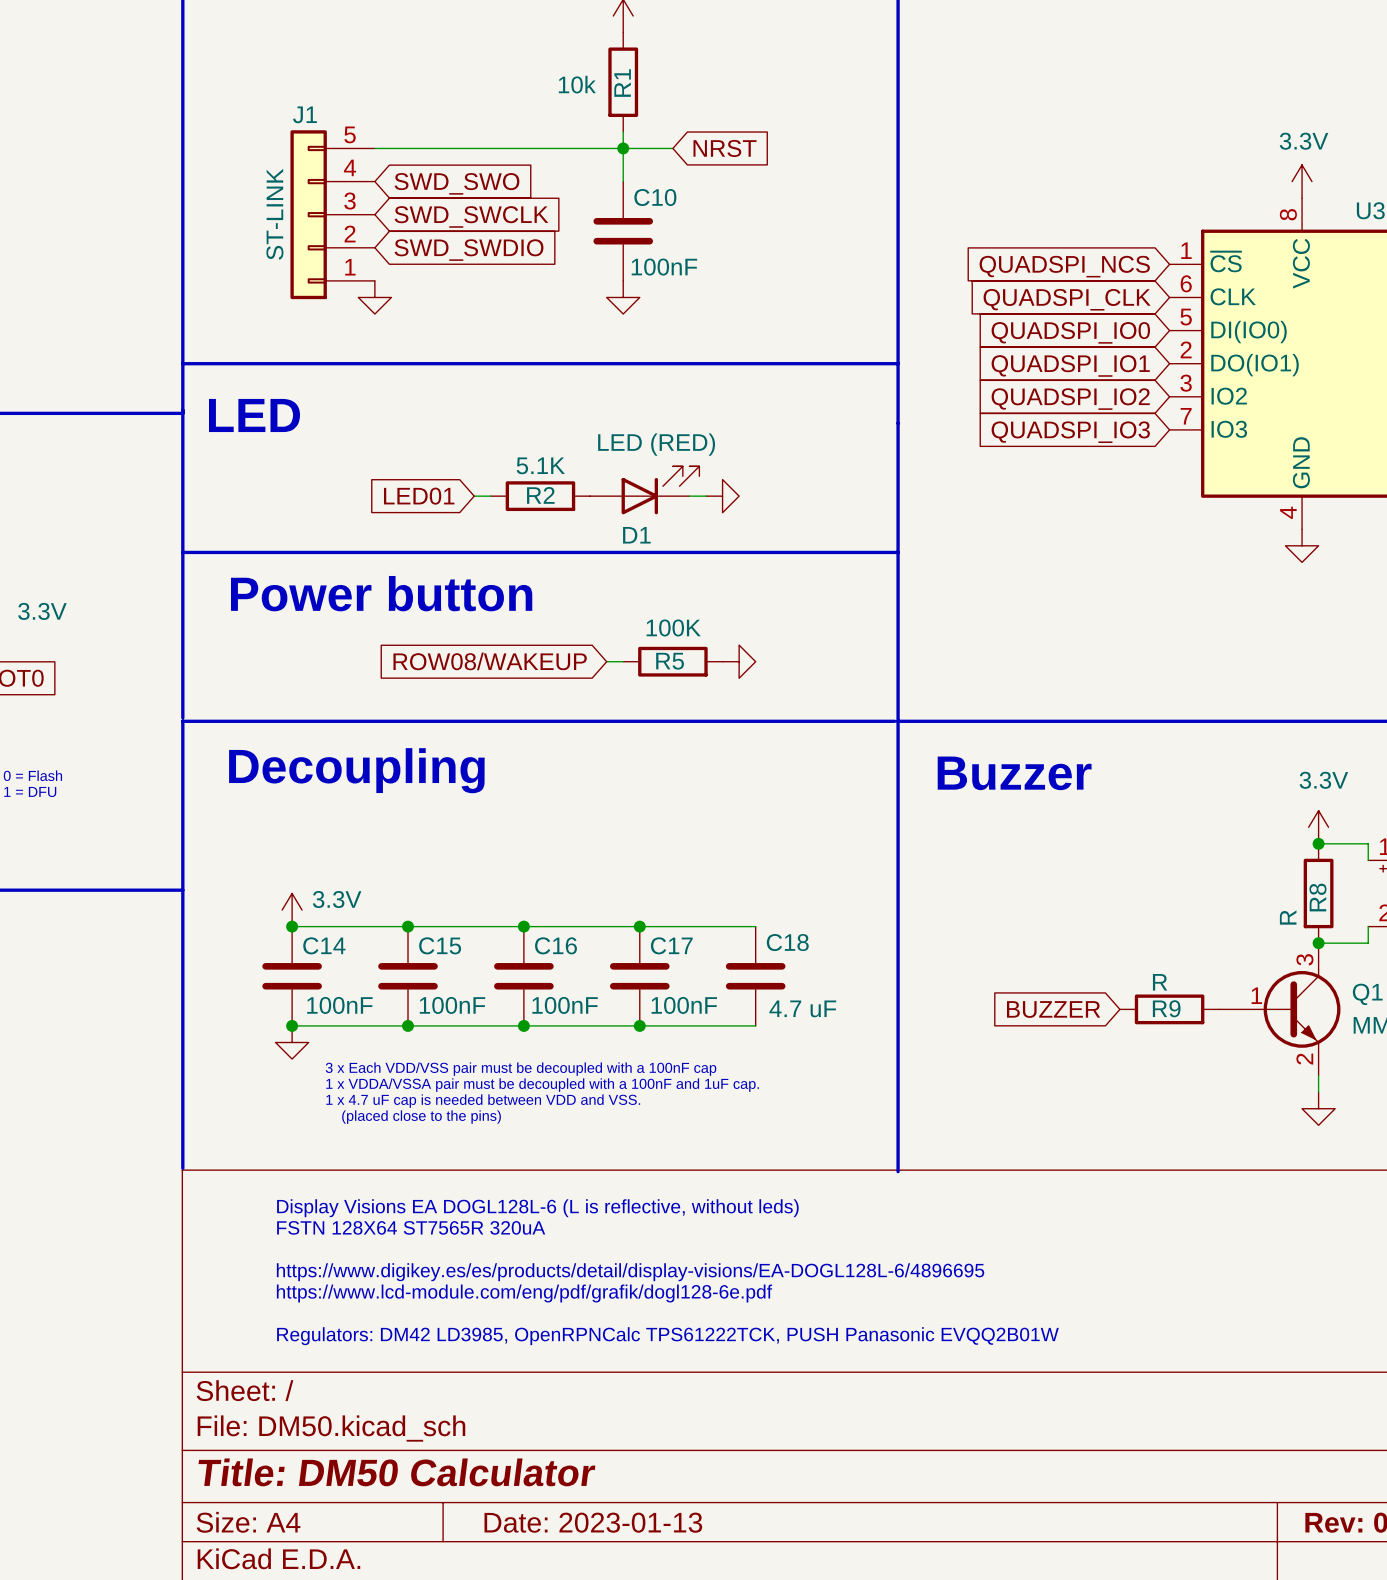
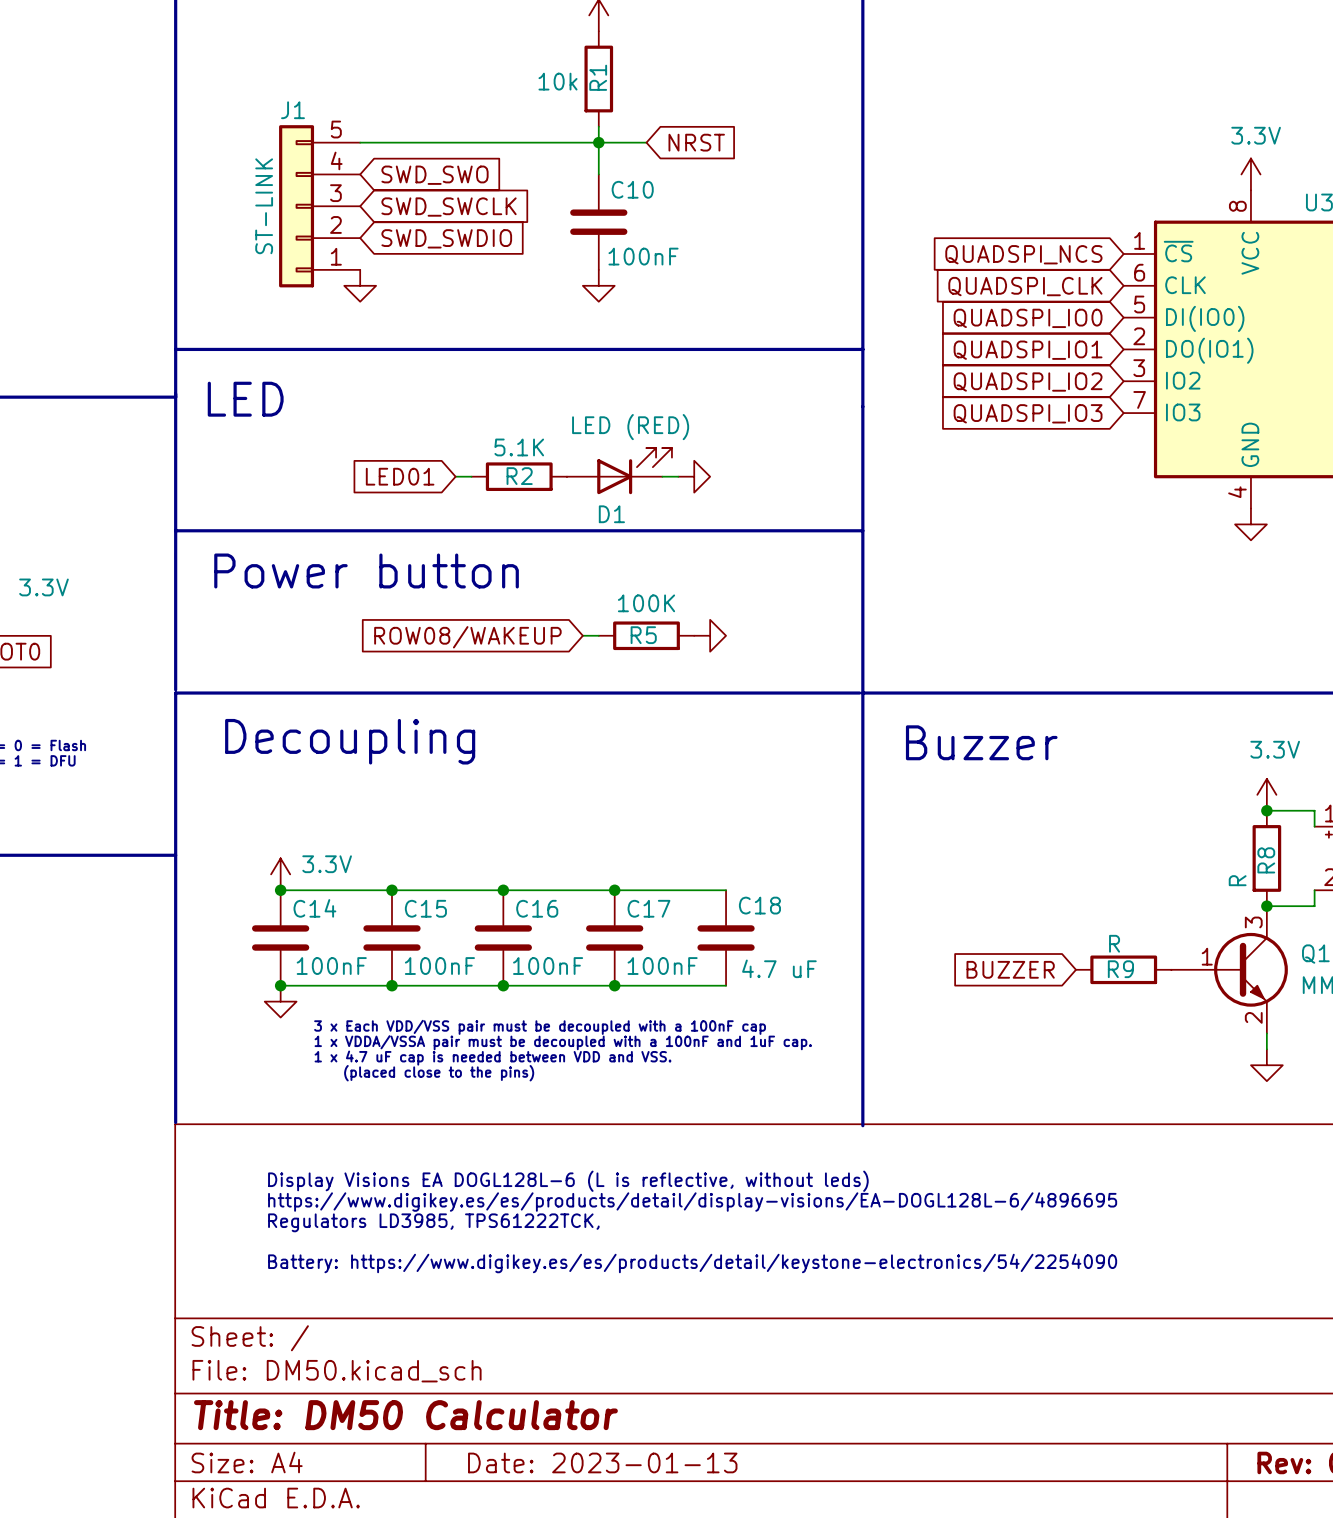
text: Display Visions EA DOGL128L-6 (L is reflective, without leds) (537, 1208) -> none
text: FSTN 128X64 ST7565R 320uA (411, 1227) -> Display Visions EA DOGL128L-6 (L is reflective, without leds) (568, 1181)
text: none -> https://www.digikey.es/es/products/detail/display-visions/EA-DOGL128L-6/4896695 (692, 1202)
text: https://www.digikey.es/es/products/detail/display-visions/EA-DOGL128L-6/4896695 (630, 1272) -> Regulators LD3985, TPS61222TCK, (433, 1222)
text: https://www.lcd-module.com/eng/pdf/grafik/dogl128-6e.pdf (524, 1293) -> none
text: none -> Battery: https://www.digikey.es/es/products/detail/keystone-electronics/54/2254090 (692, 1263)
text: Regulators: DM42 LD3985, OpenRPNCalc TPS61222TCK, PUSH Panasonic EVQQ2B01W (667, 1336) -> none

